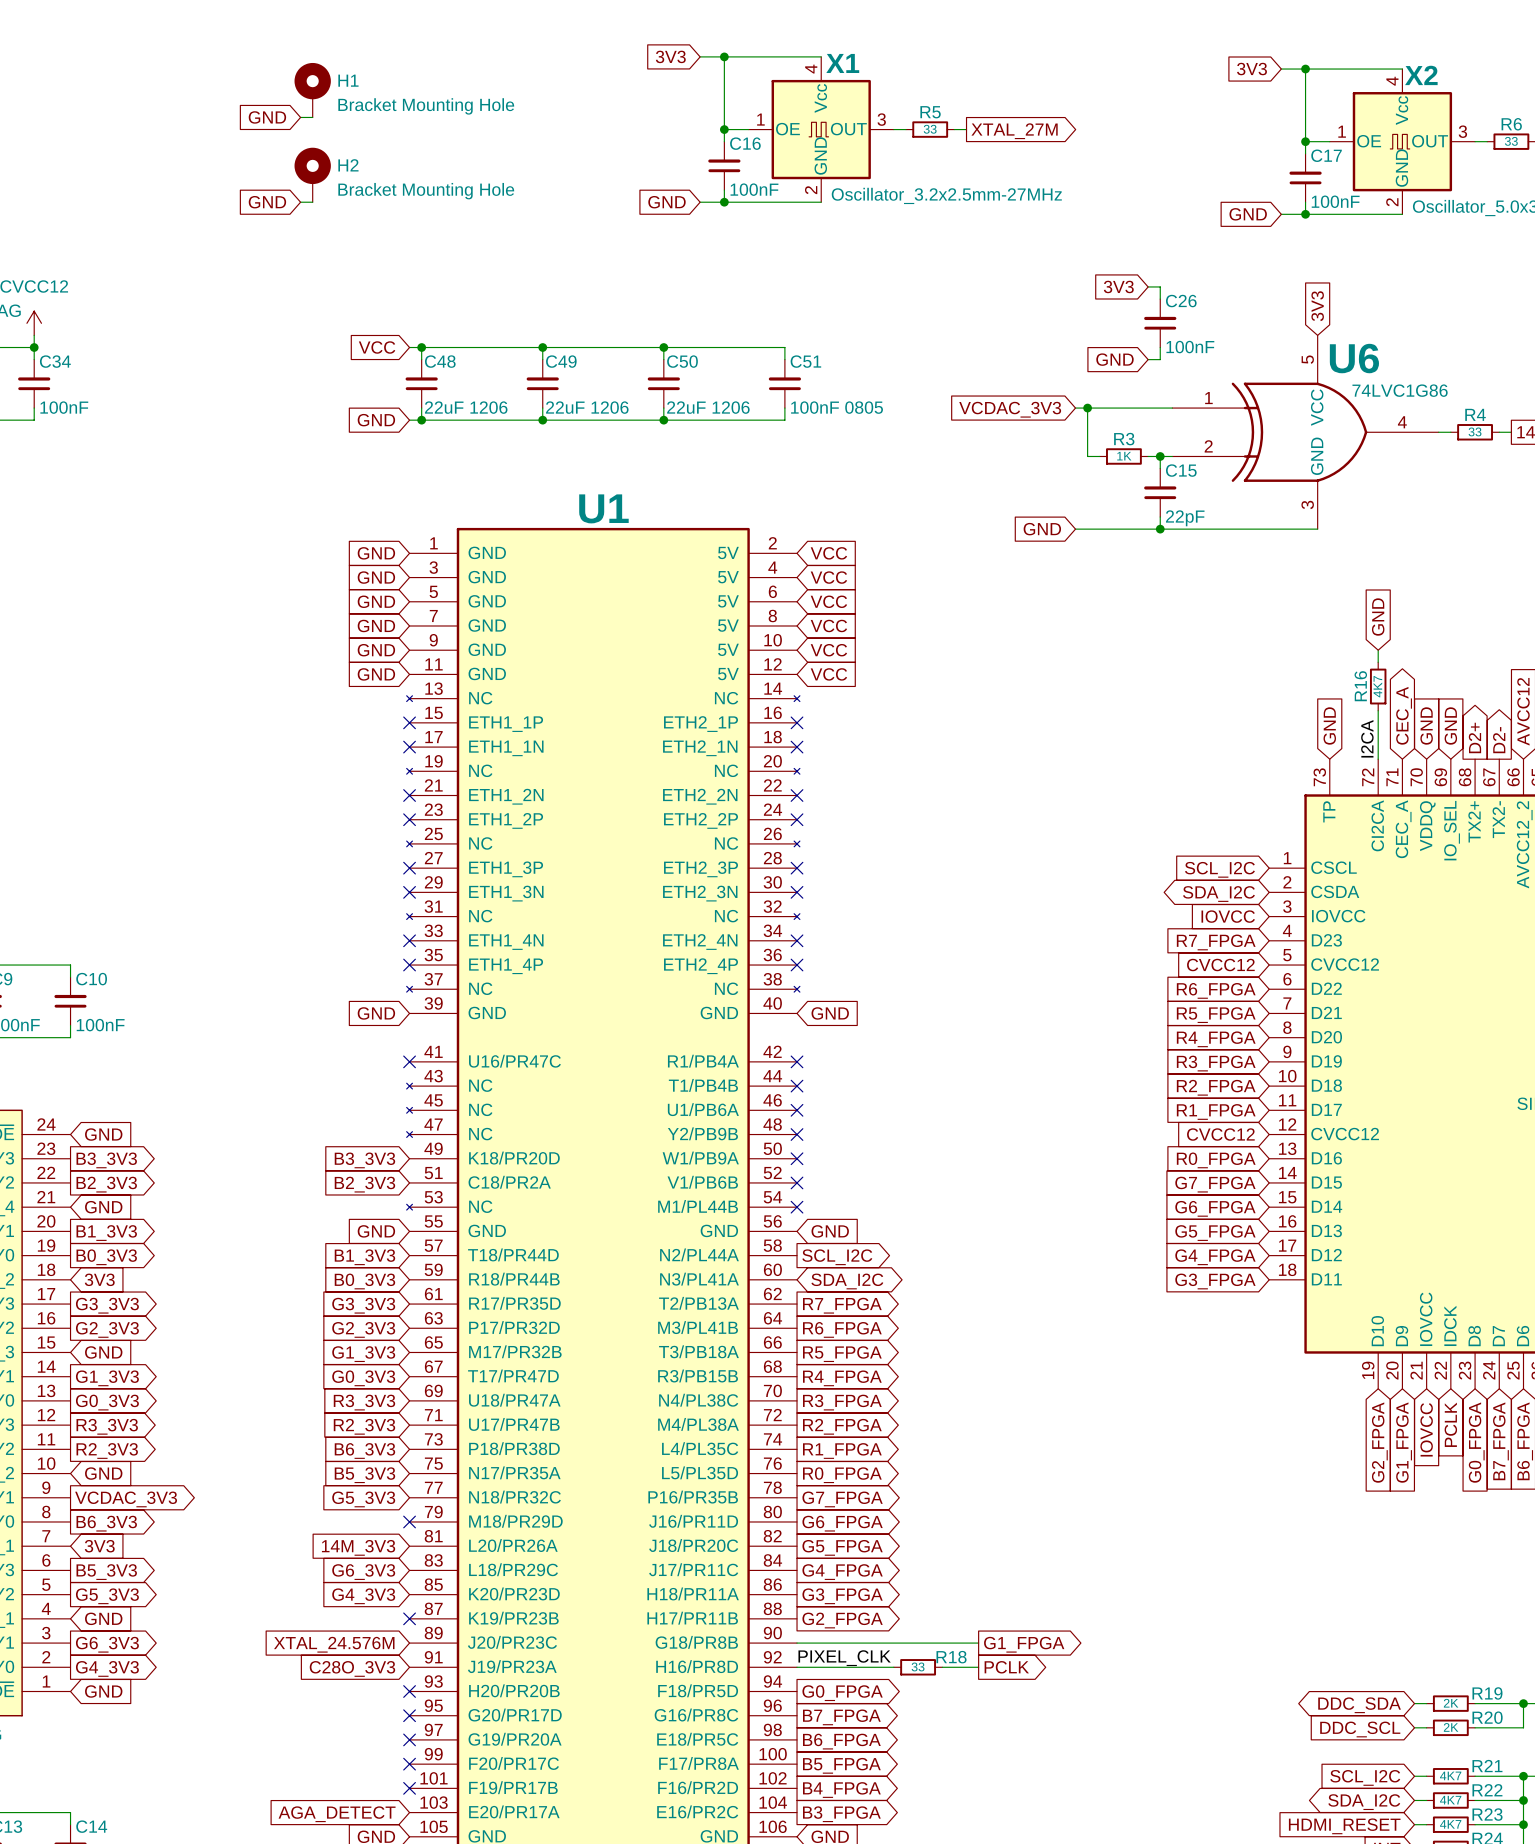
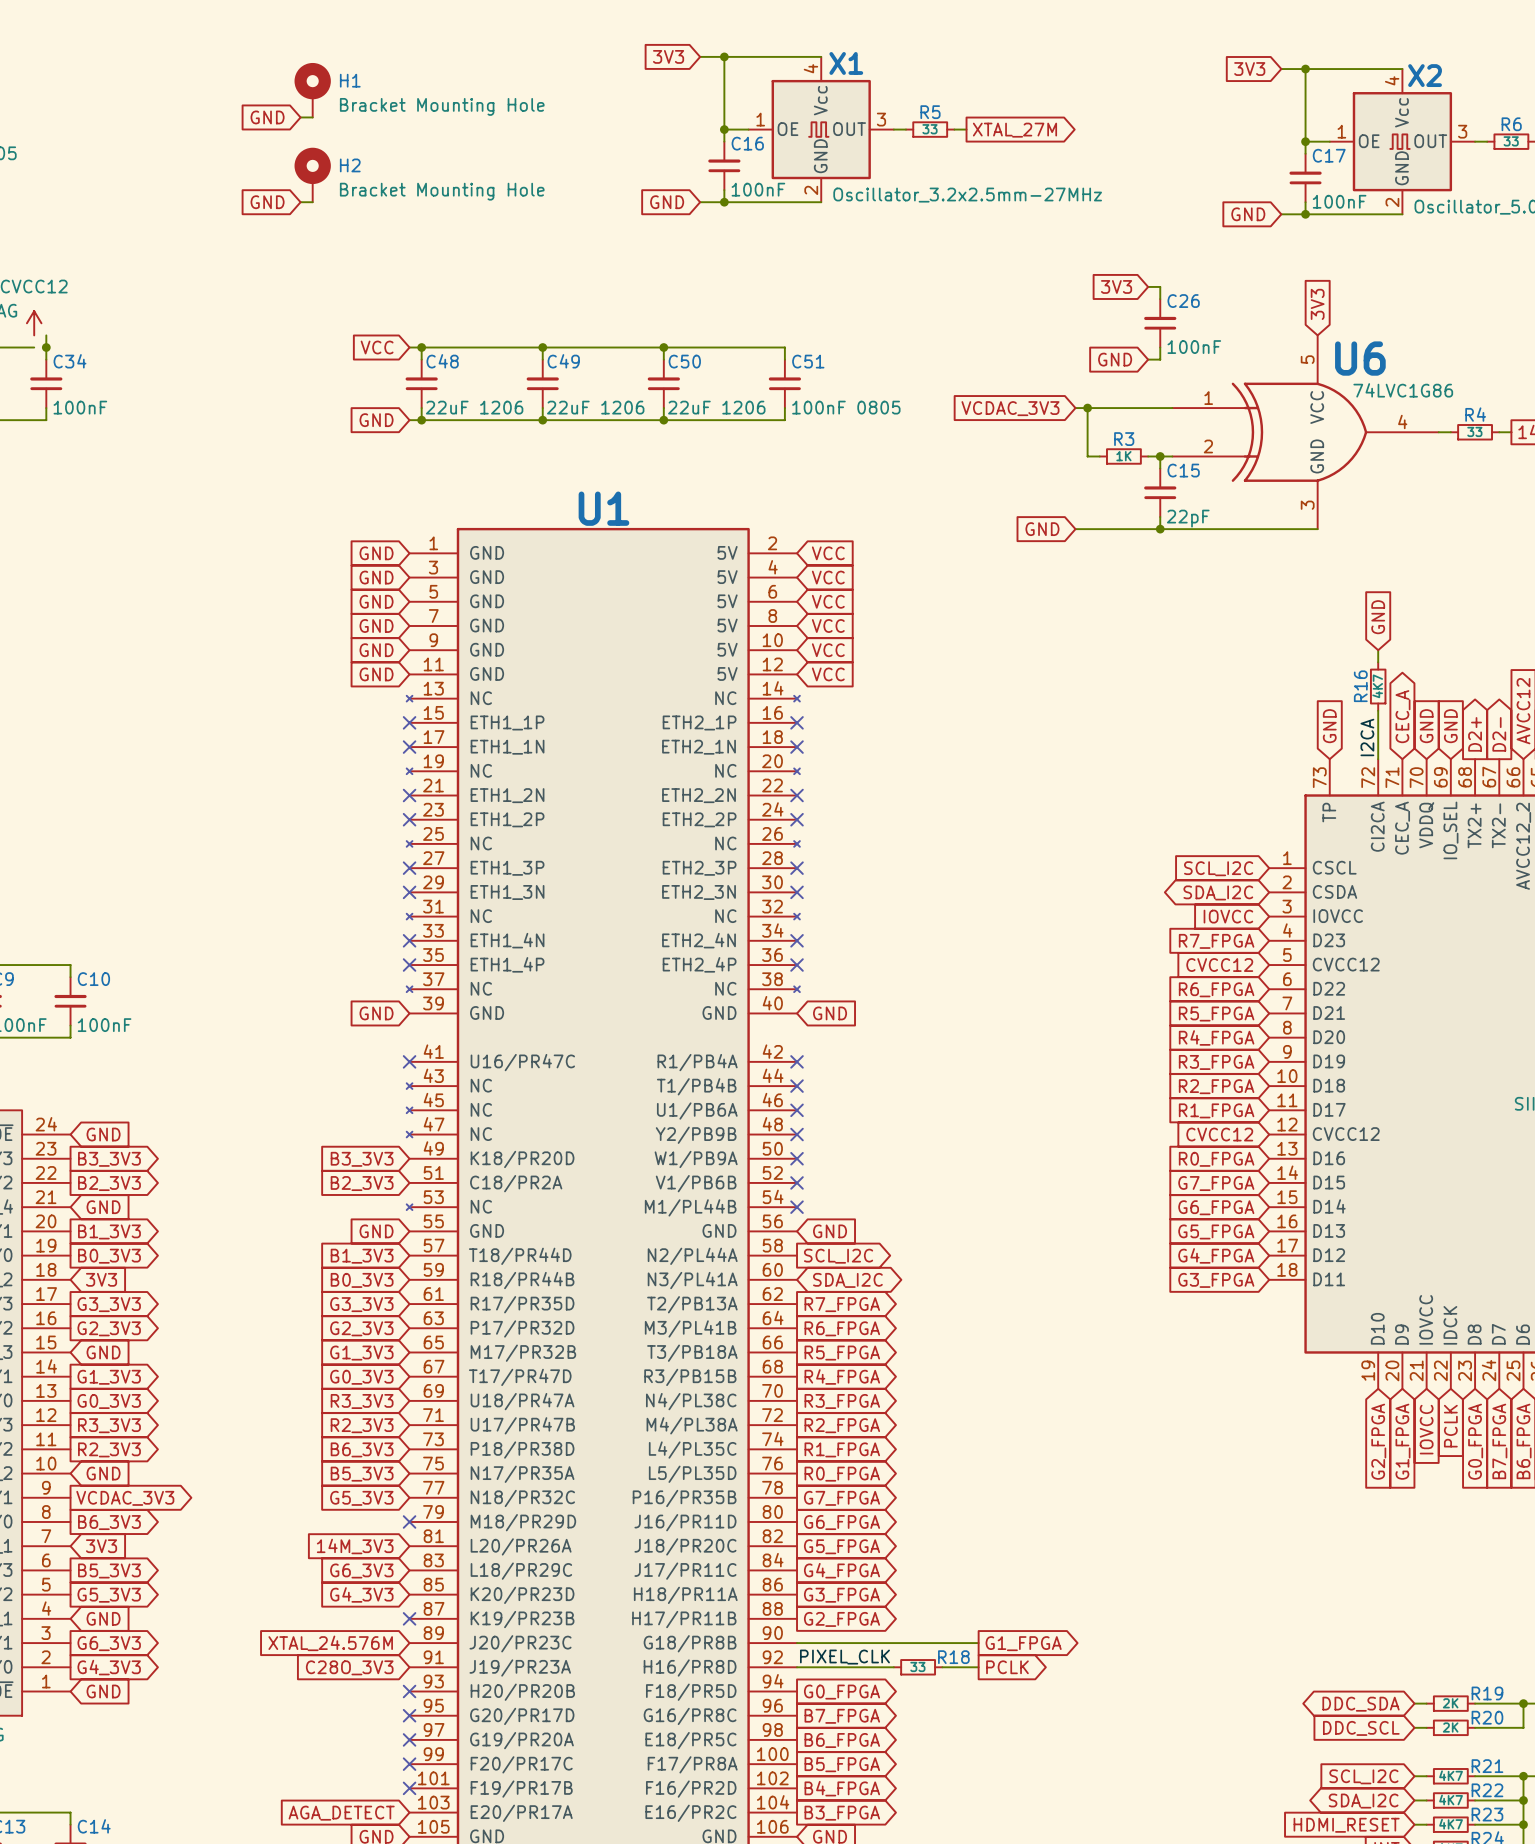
wire: (34, 335) (34, 359) -> (46, 335) (46, 359)
junction position: (34, 347) -> (46, 347)
C34 position: (34, 383) -> (46, 383)
wire: (34, 408) (34, 420) -> (46, 408) (46, 420) (34, 420)

